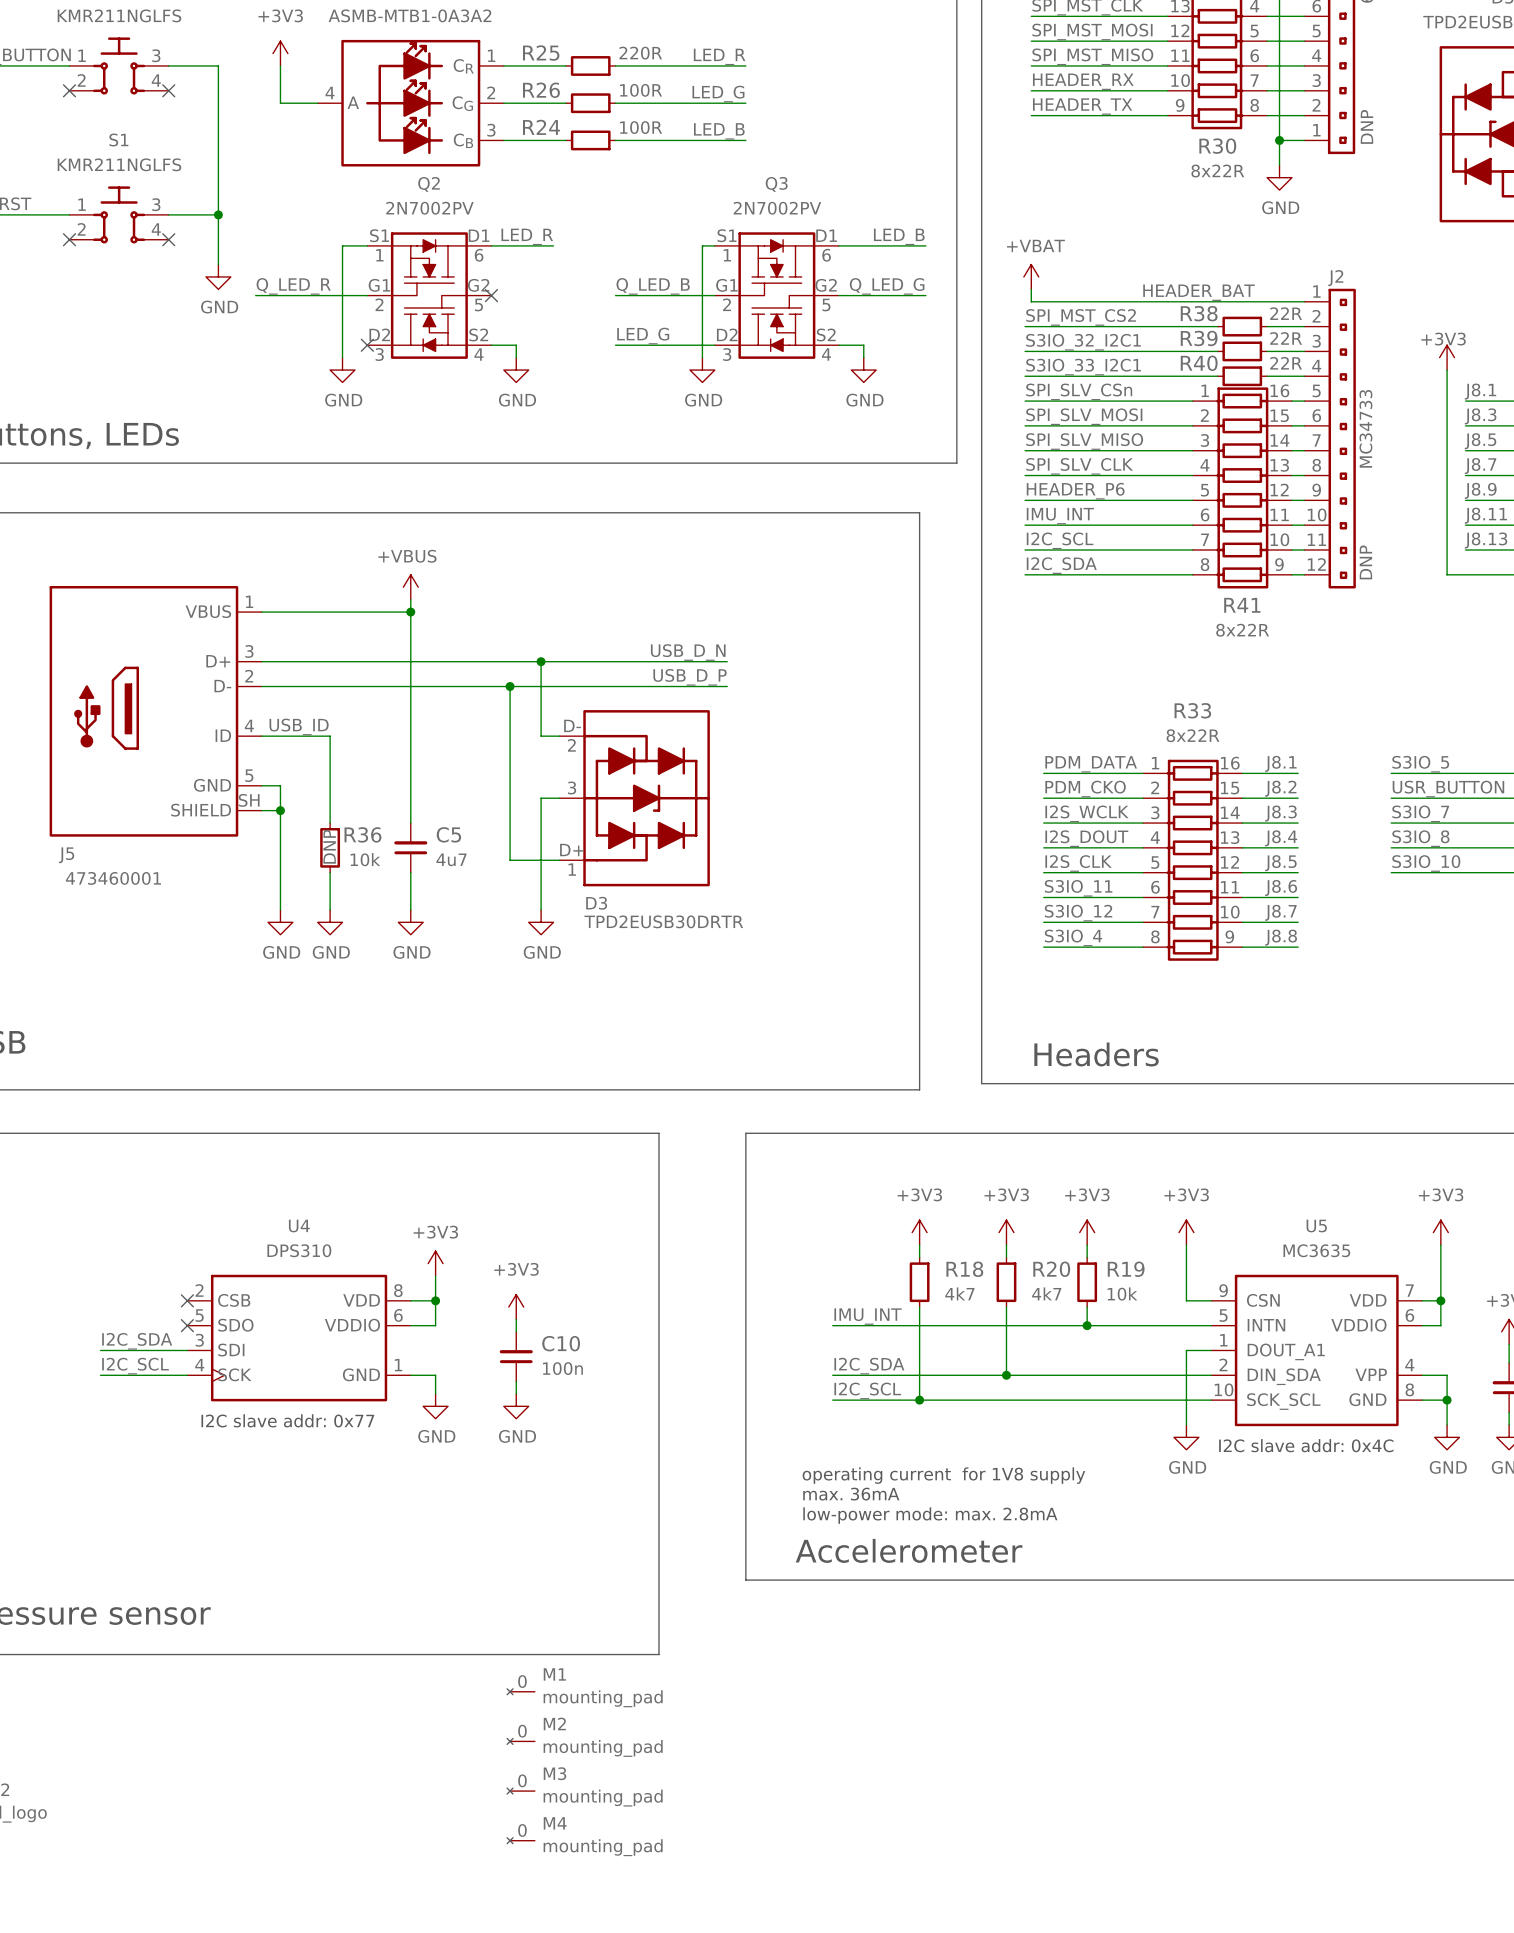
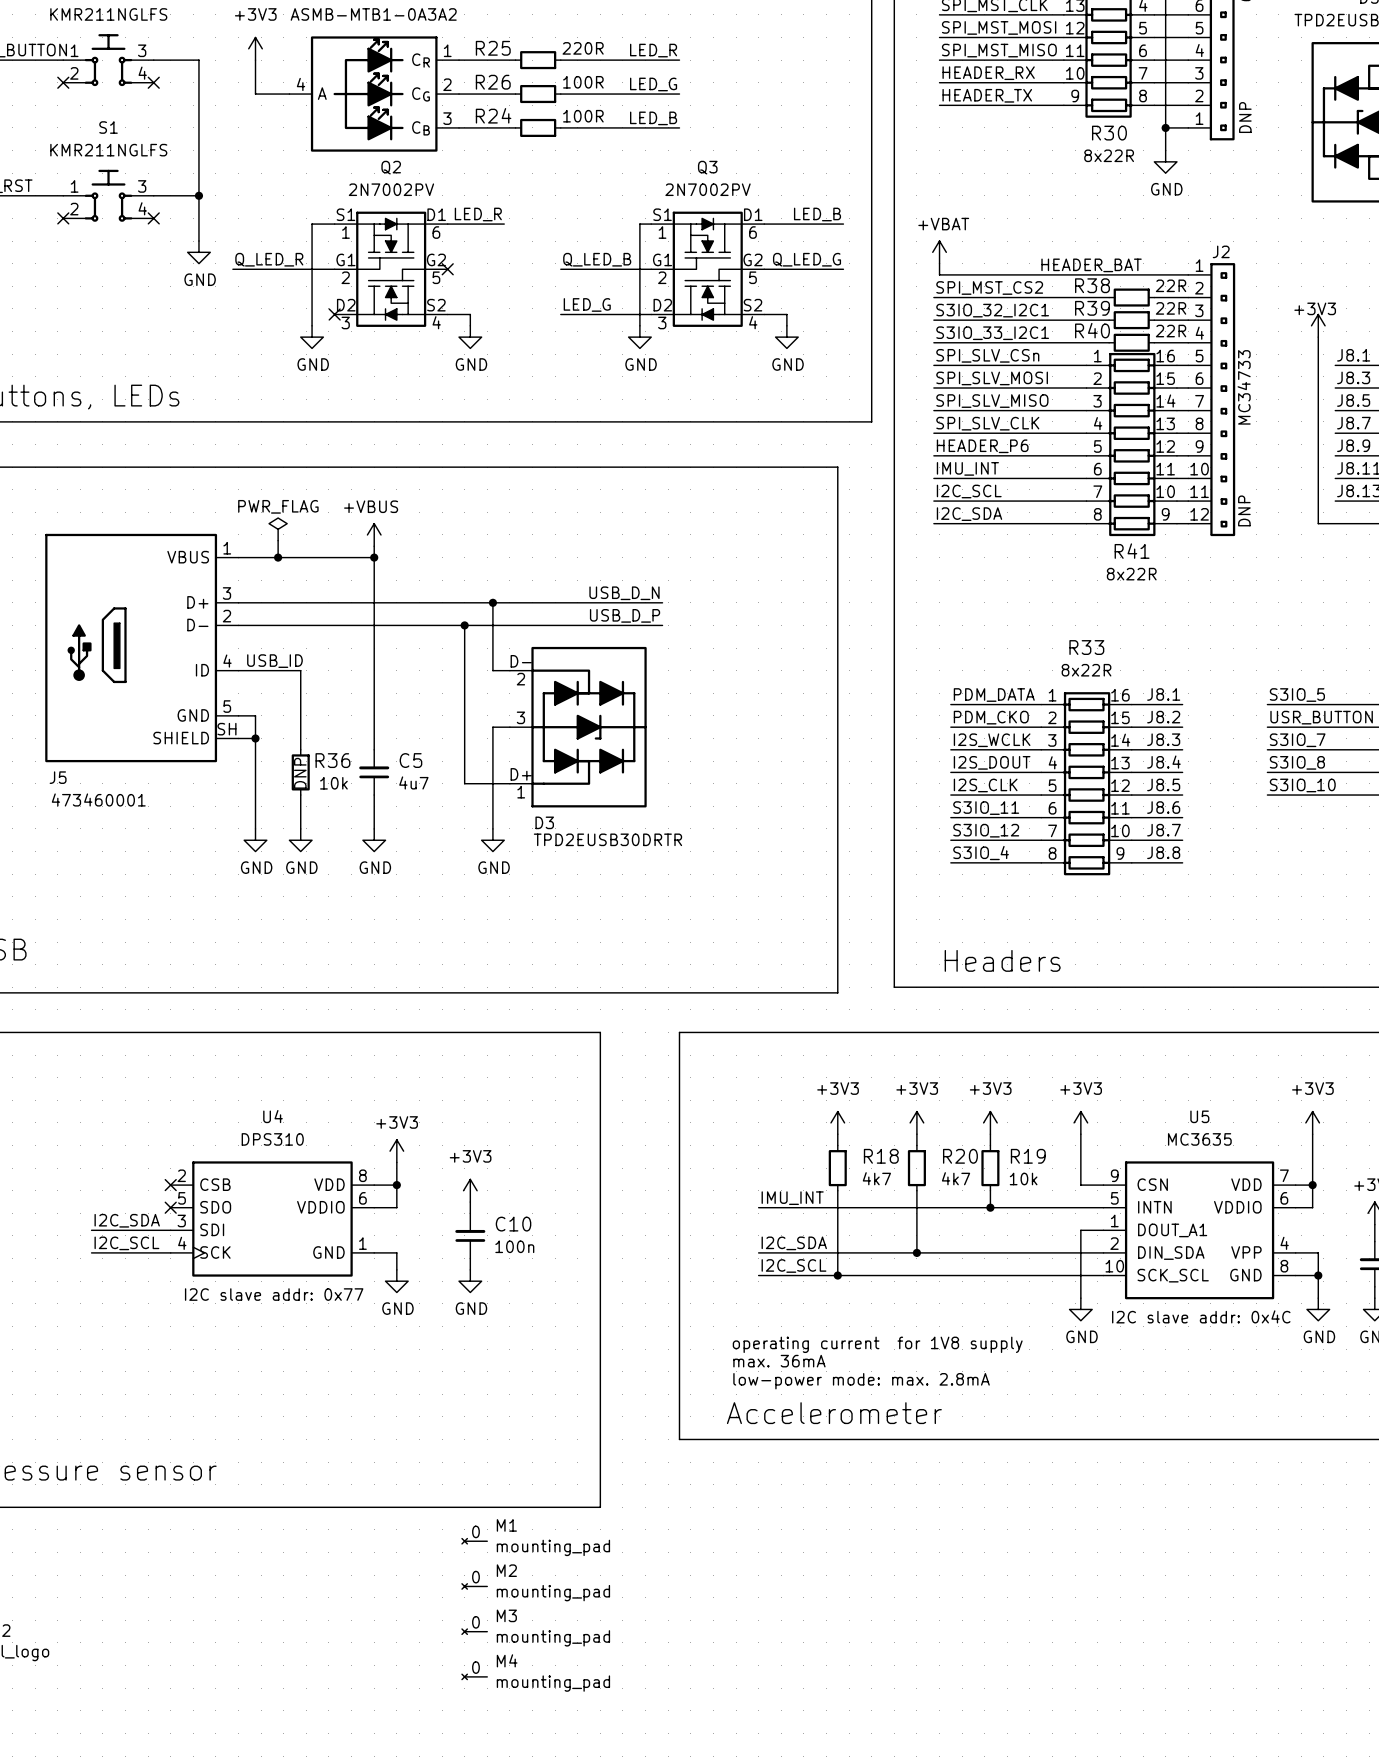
power symbol: none -> PWR_FLAG (278, 529)
wire: none -> (278, 540) (278, 557)
junction: none -> (278, 557)

